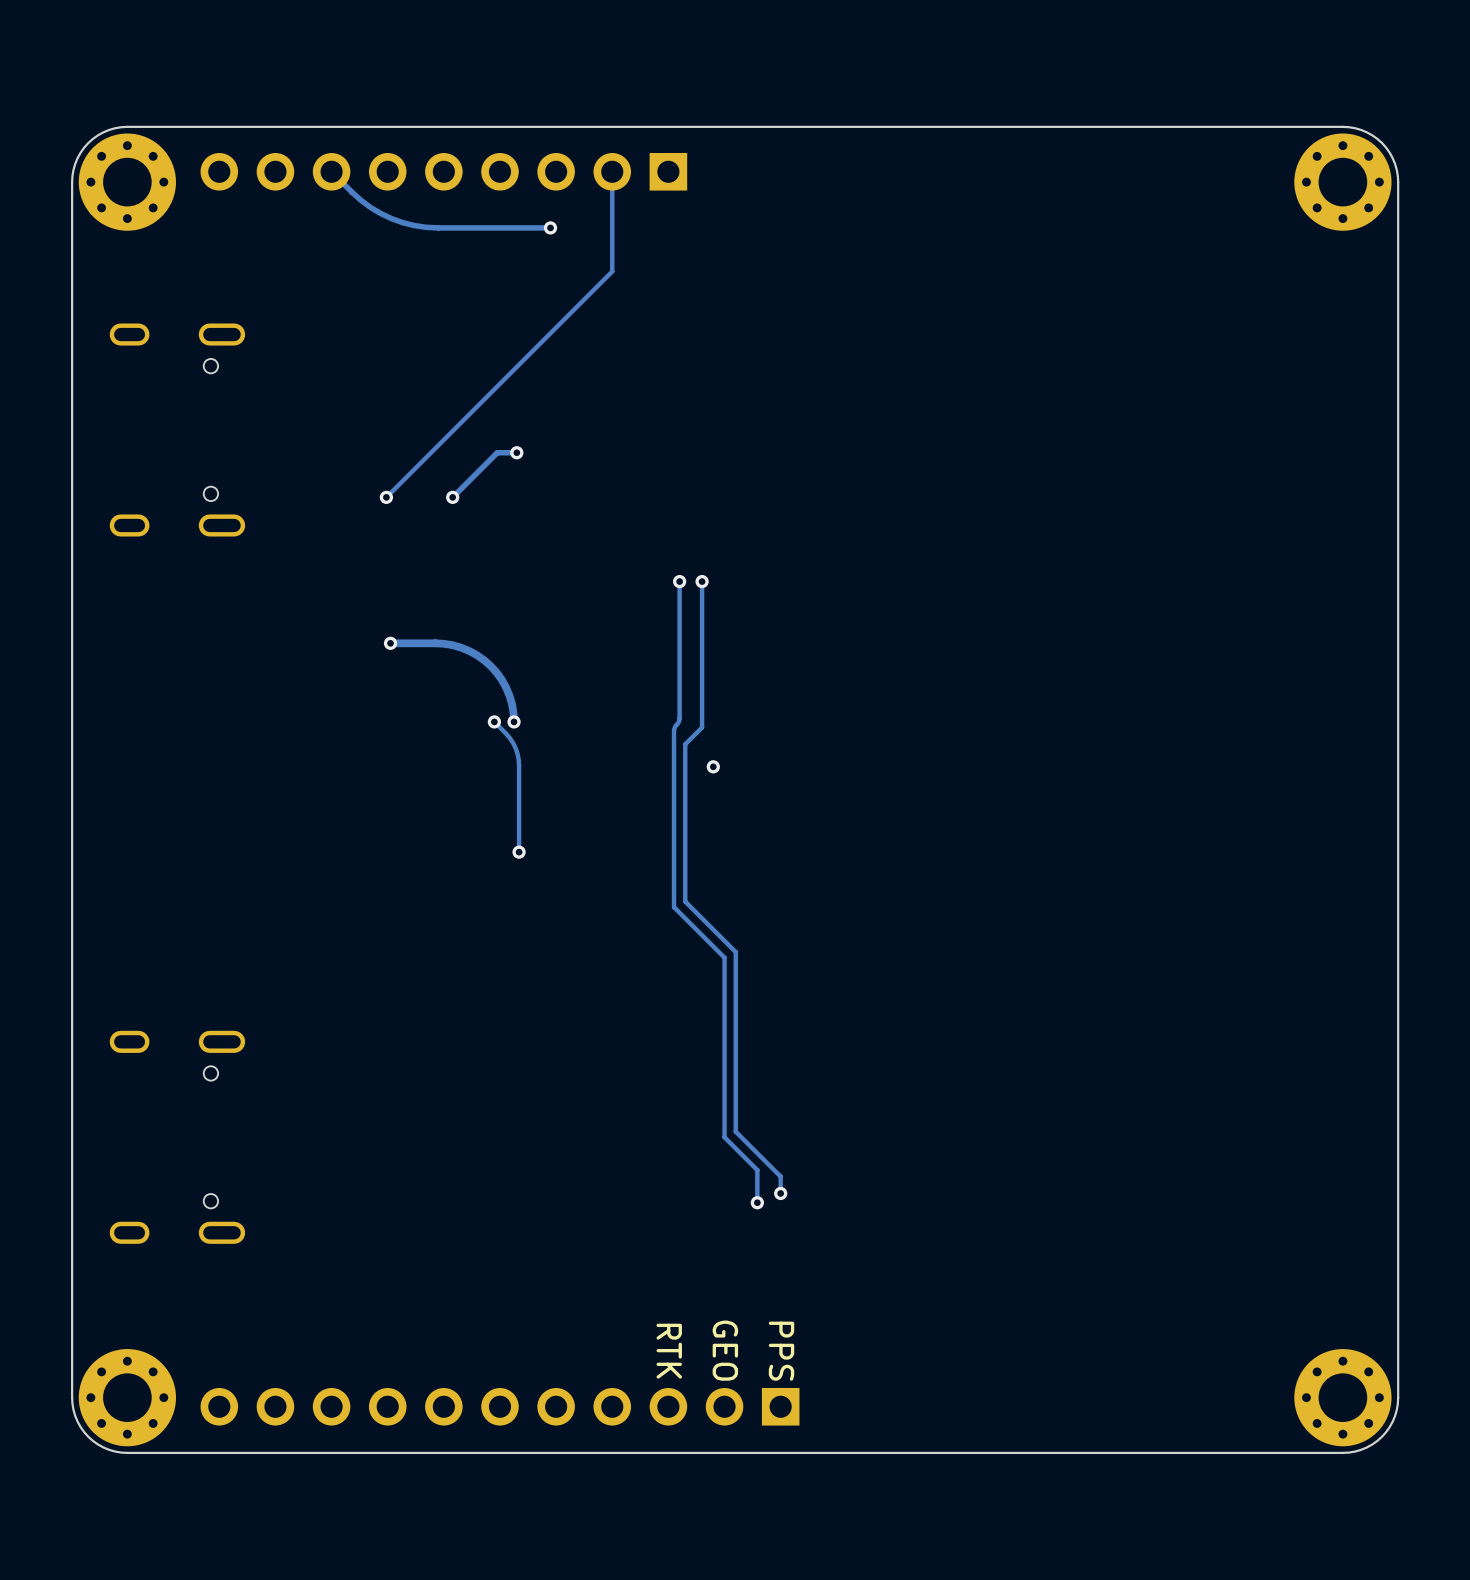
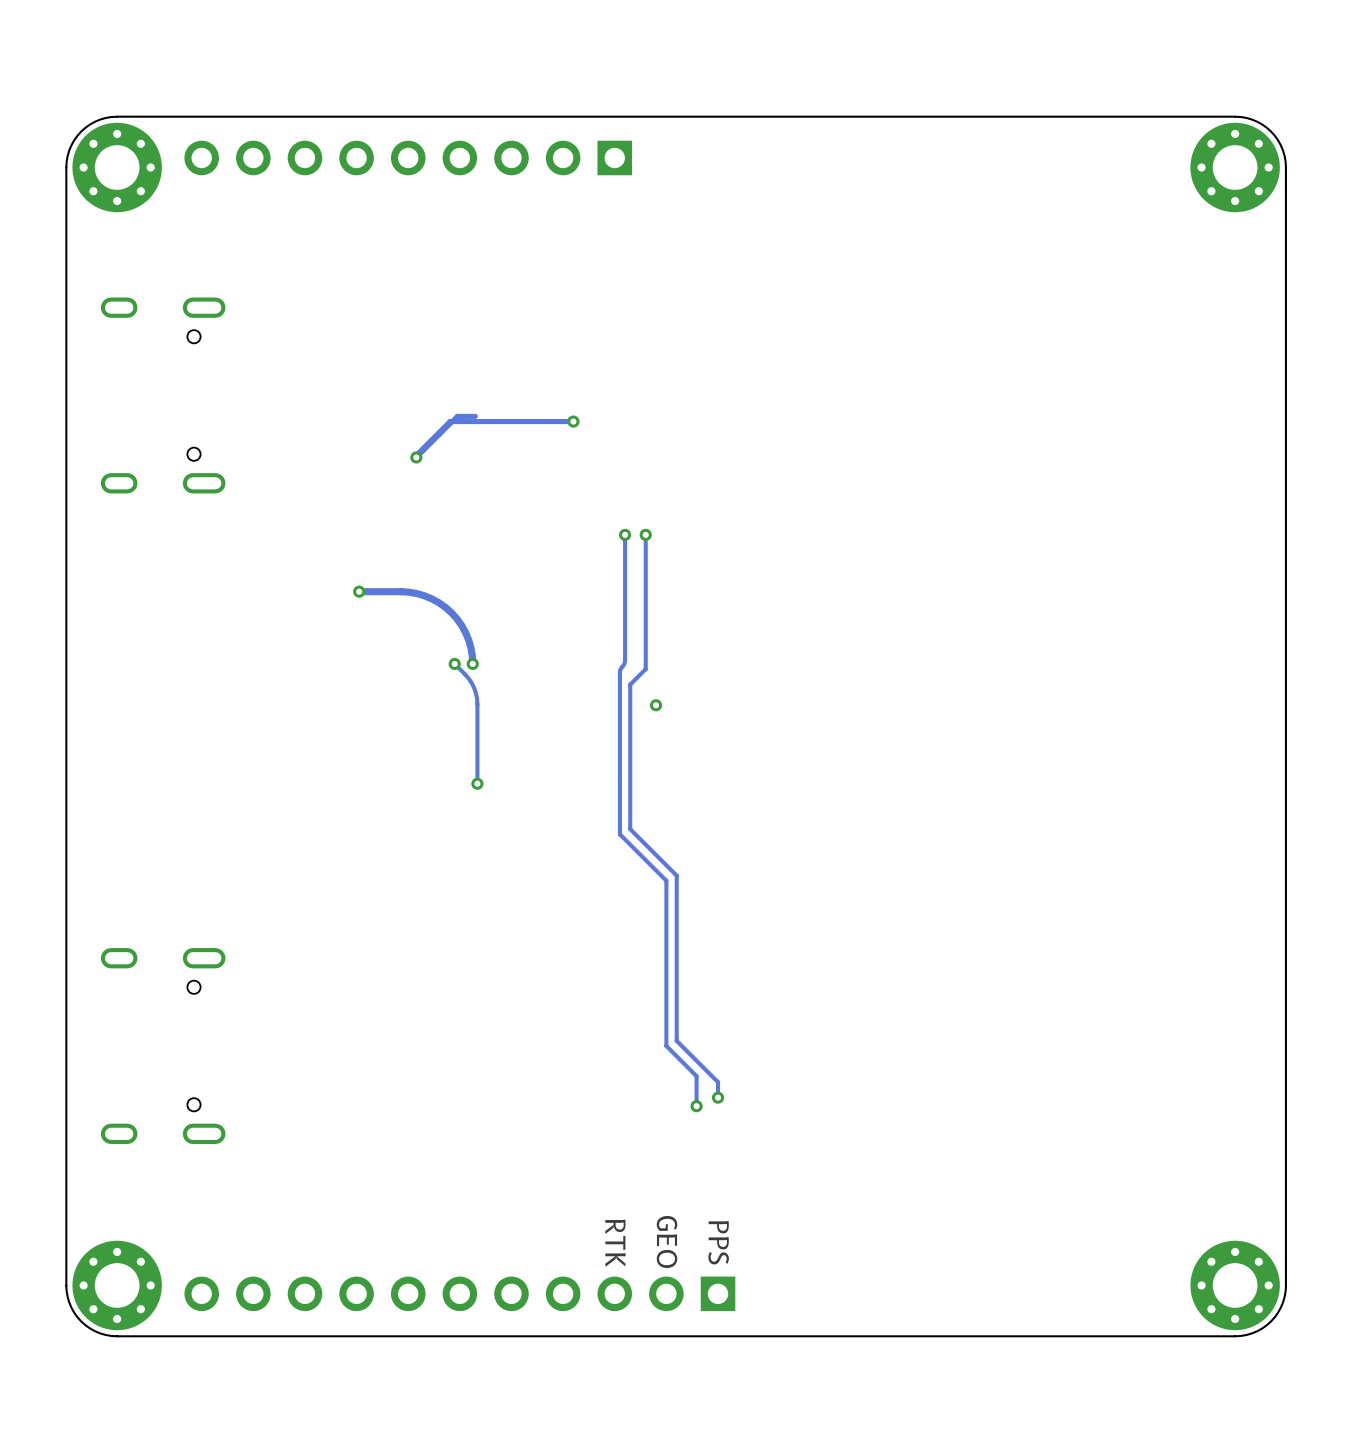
track: (331, 171) (370, 207) (402, 222) (438, 227) (550, 227) -> none
track: (612, 171) (612, 271) (386, 497) -> none
via: (550, 227) -> none
via position: (516, 452) -> (573, 421)
track: none -> (573, 421) (450, 421) (416, 455)
via: (386, 497) -> none

